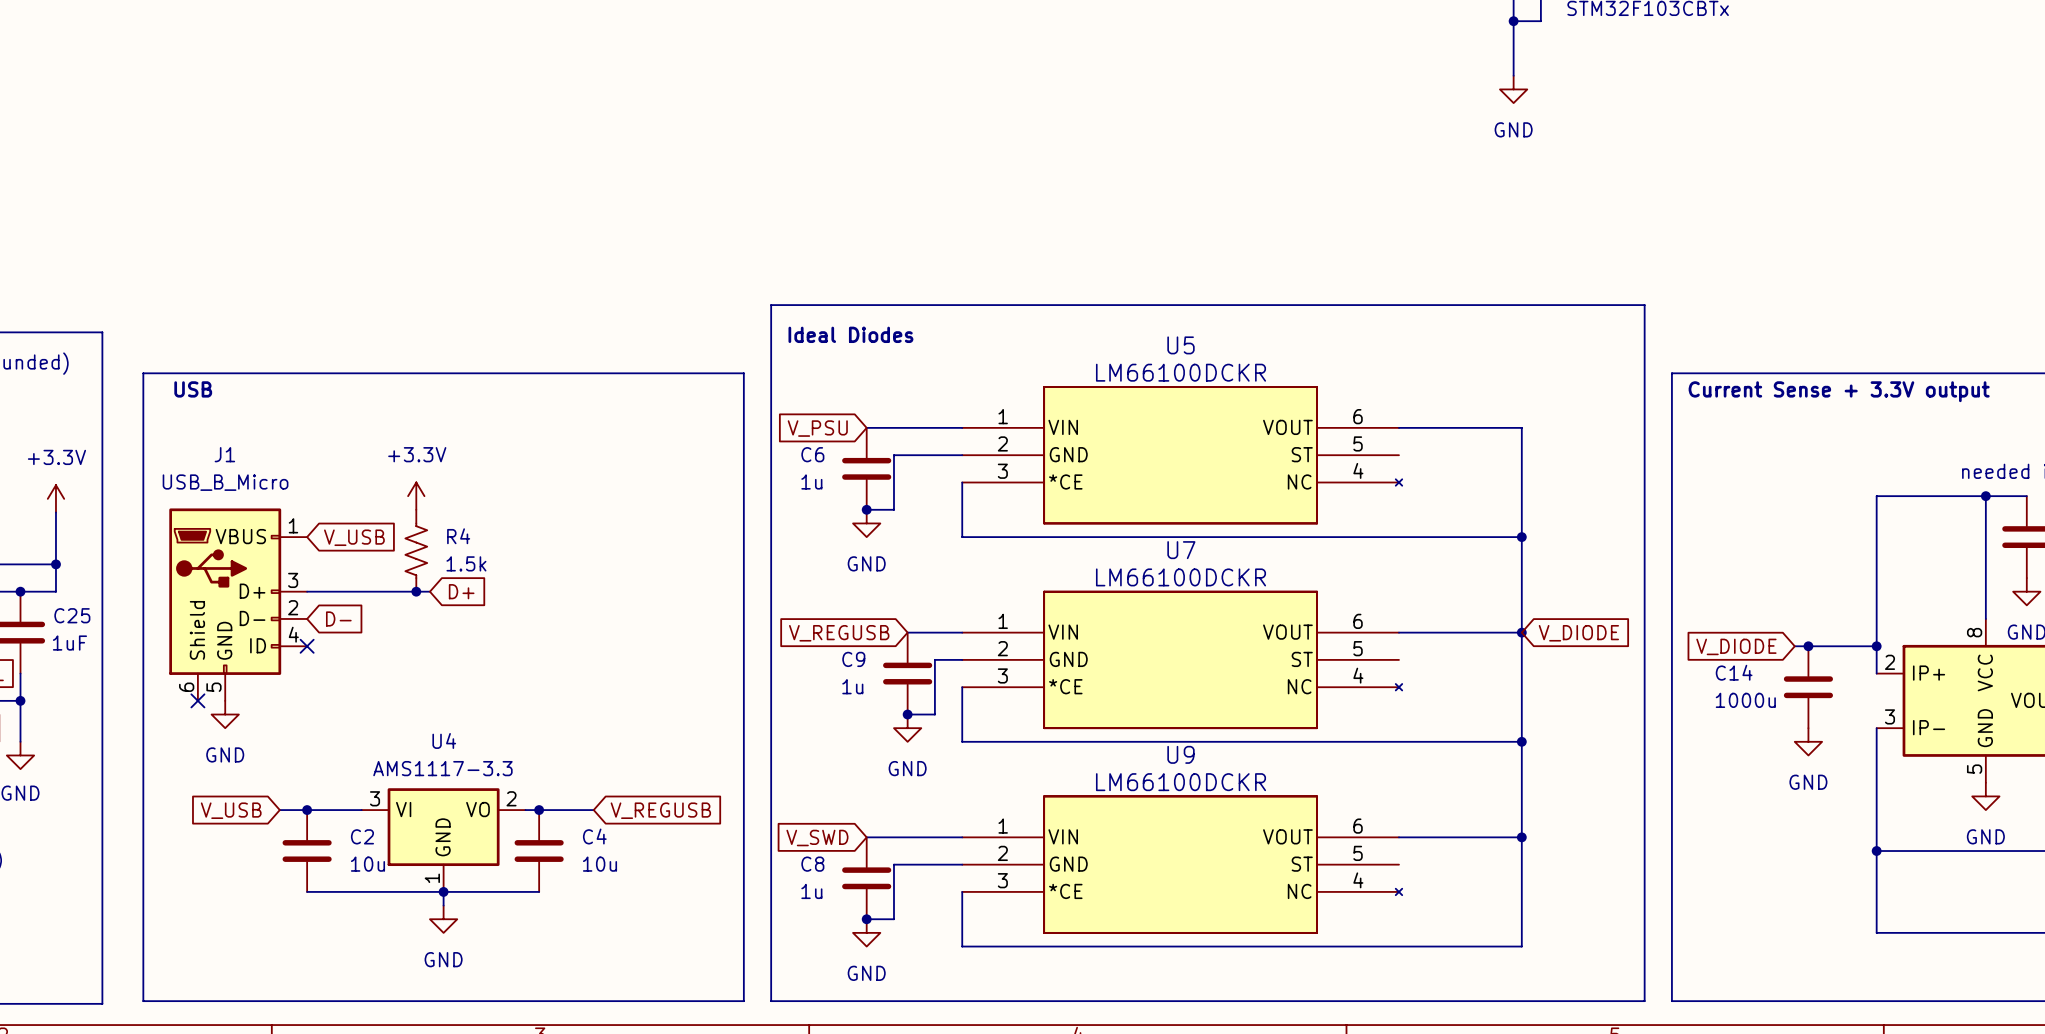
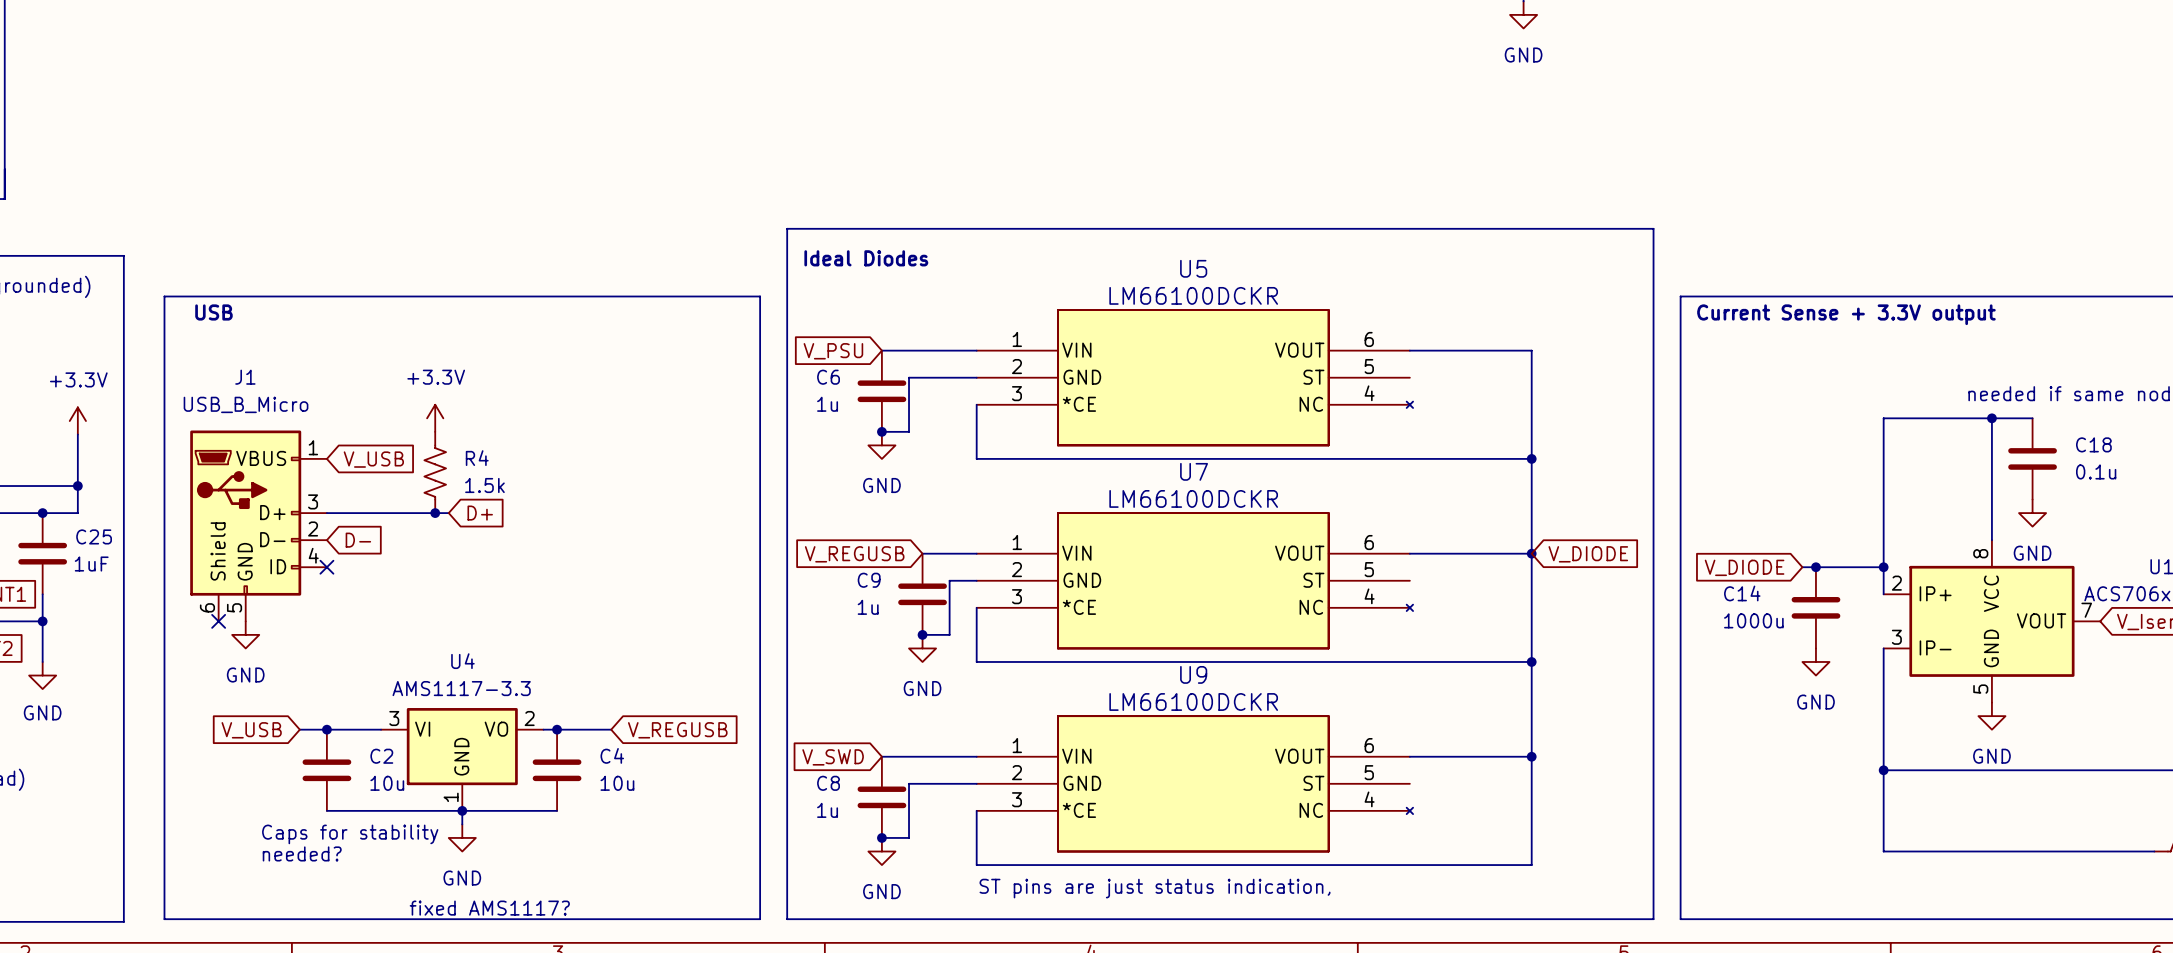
text: none -> Caps for stability (350, 834)
text: none -> needed? (302, 853)
text: none -> ST pins are just status indication, (1155, 888)
text: none -> fixed AMS1117? (489, 908)

